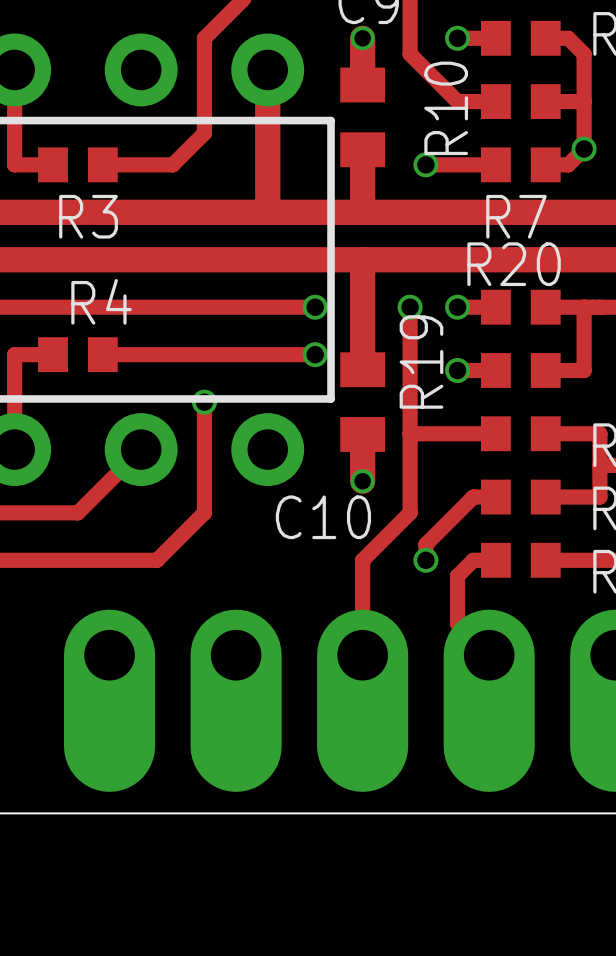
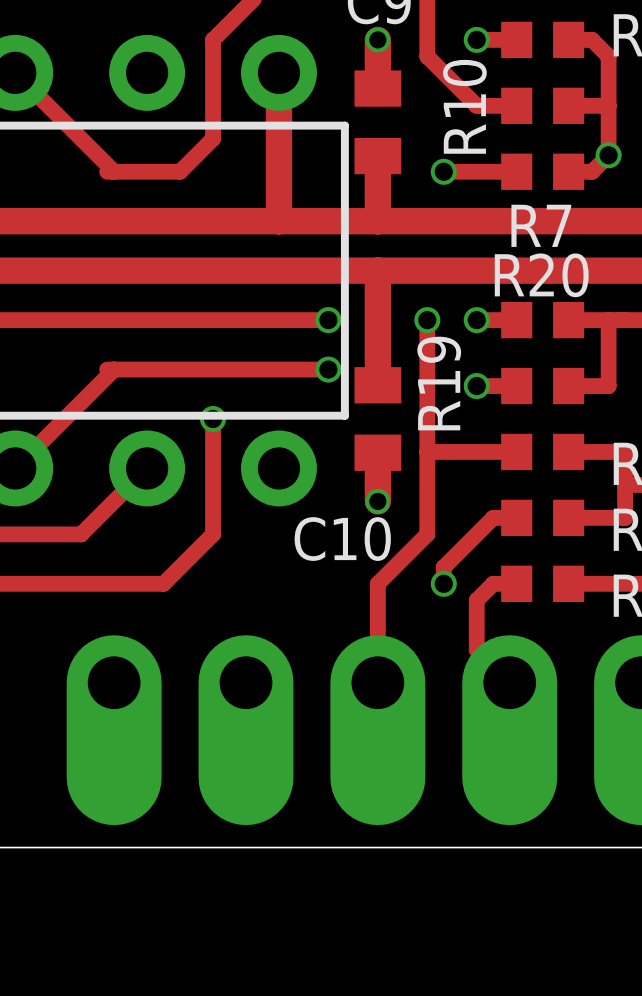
track: (14, 69) (14, 164) (53, 164) -> (15, 72) (114, 171)
R3: (77, 164) -> none
track: (53, 354) (14, 354) (14, 449) -> (114, 369) (15, 468)
R4: (77, 354) -> none

